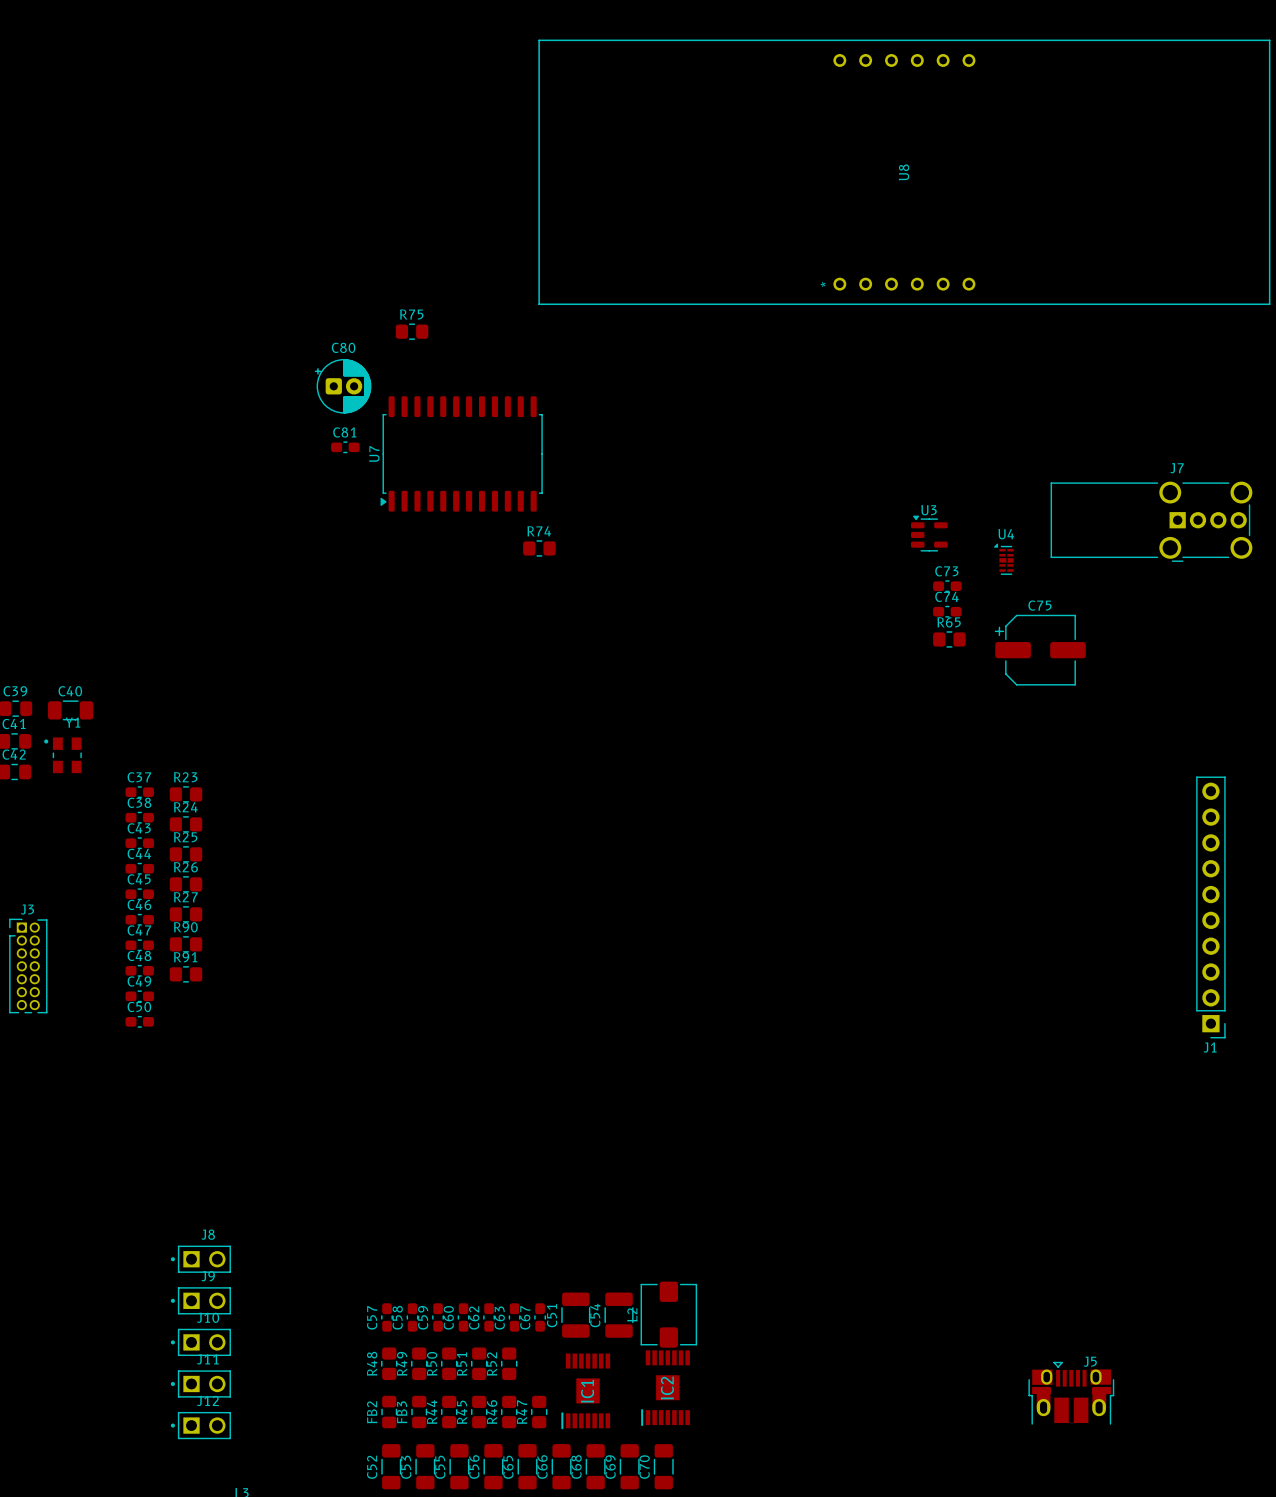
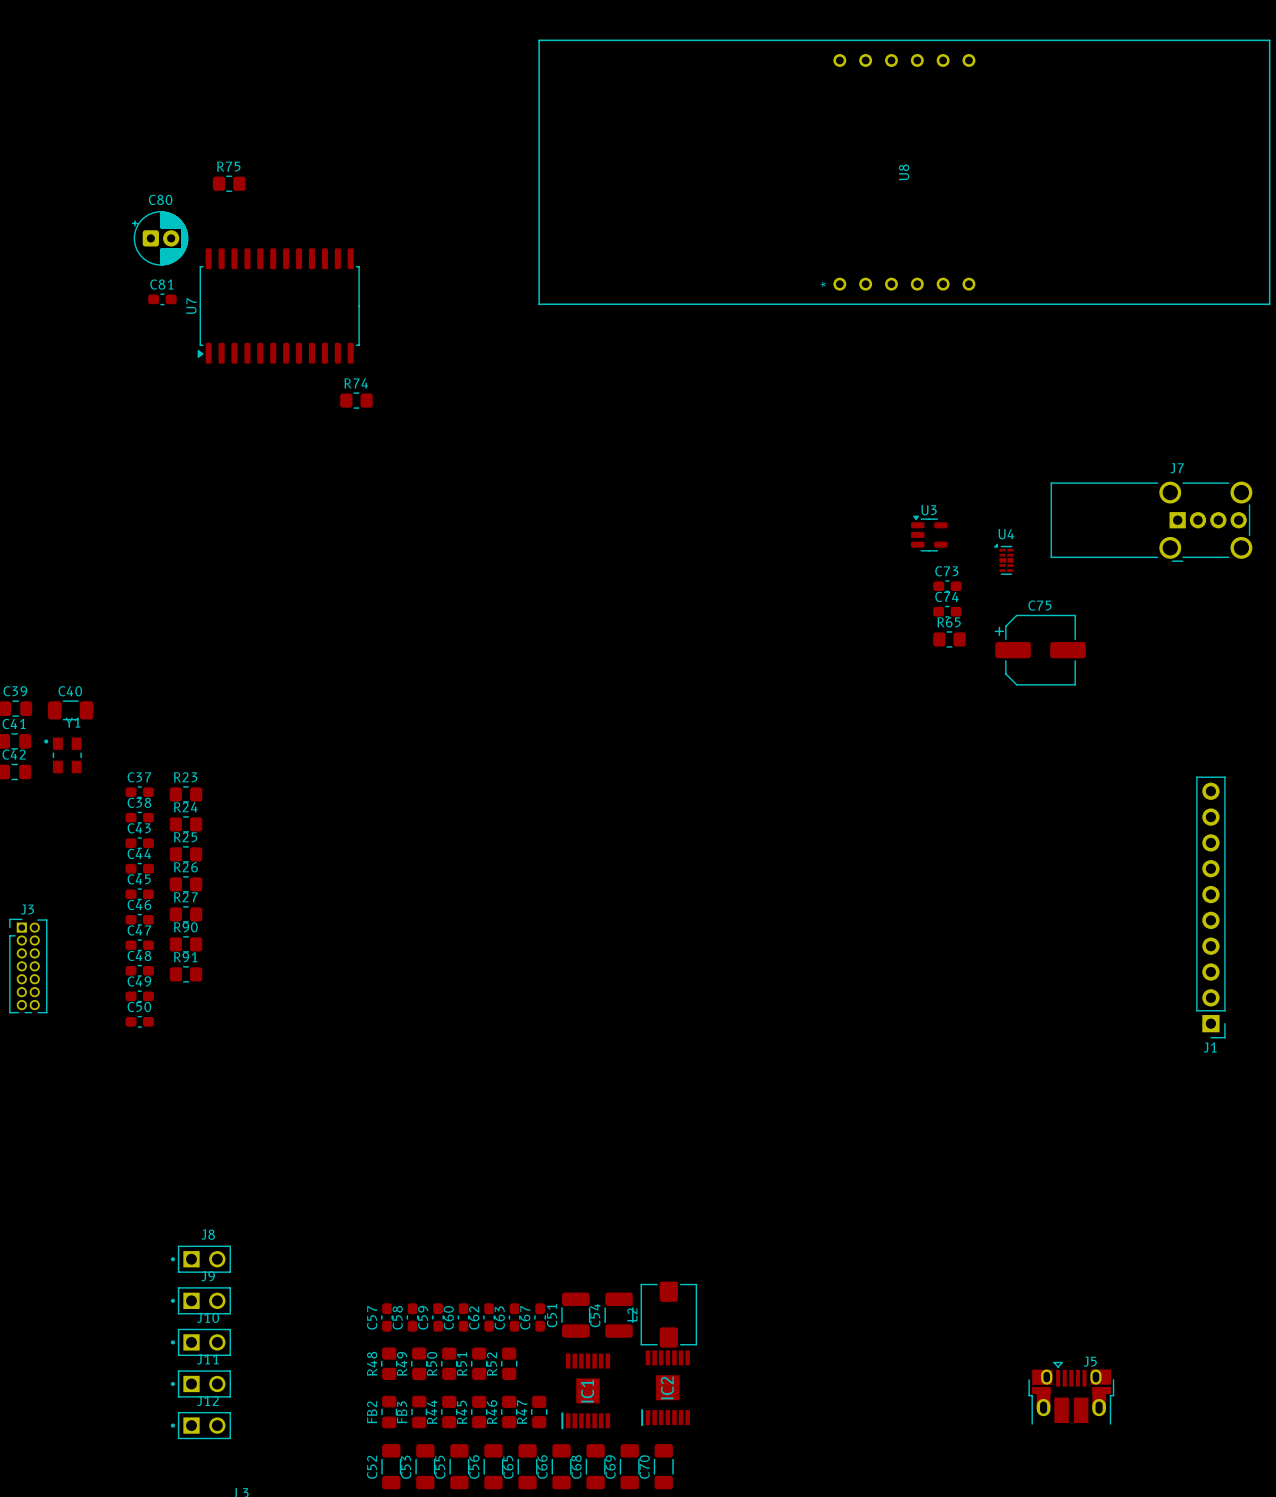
R75 position: (412, 331) -> (229, 183)
C80 position: (343, 386) -> (160, 238)
C81 position: (345, 447) -> (162, 299)
U7 position: (461, 453) -> (278, 306)
R74 position: (539, 548) -> (356, 400)

